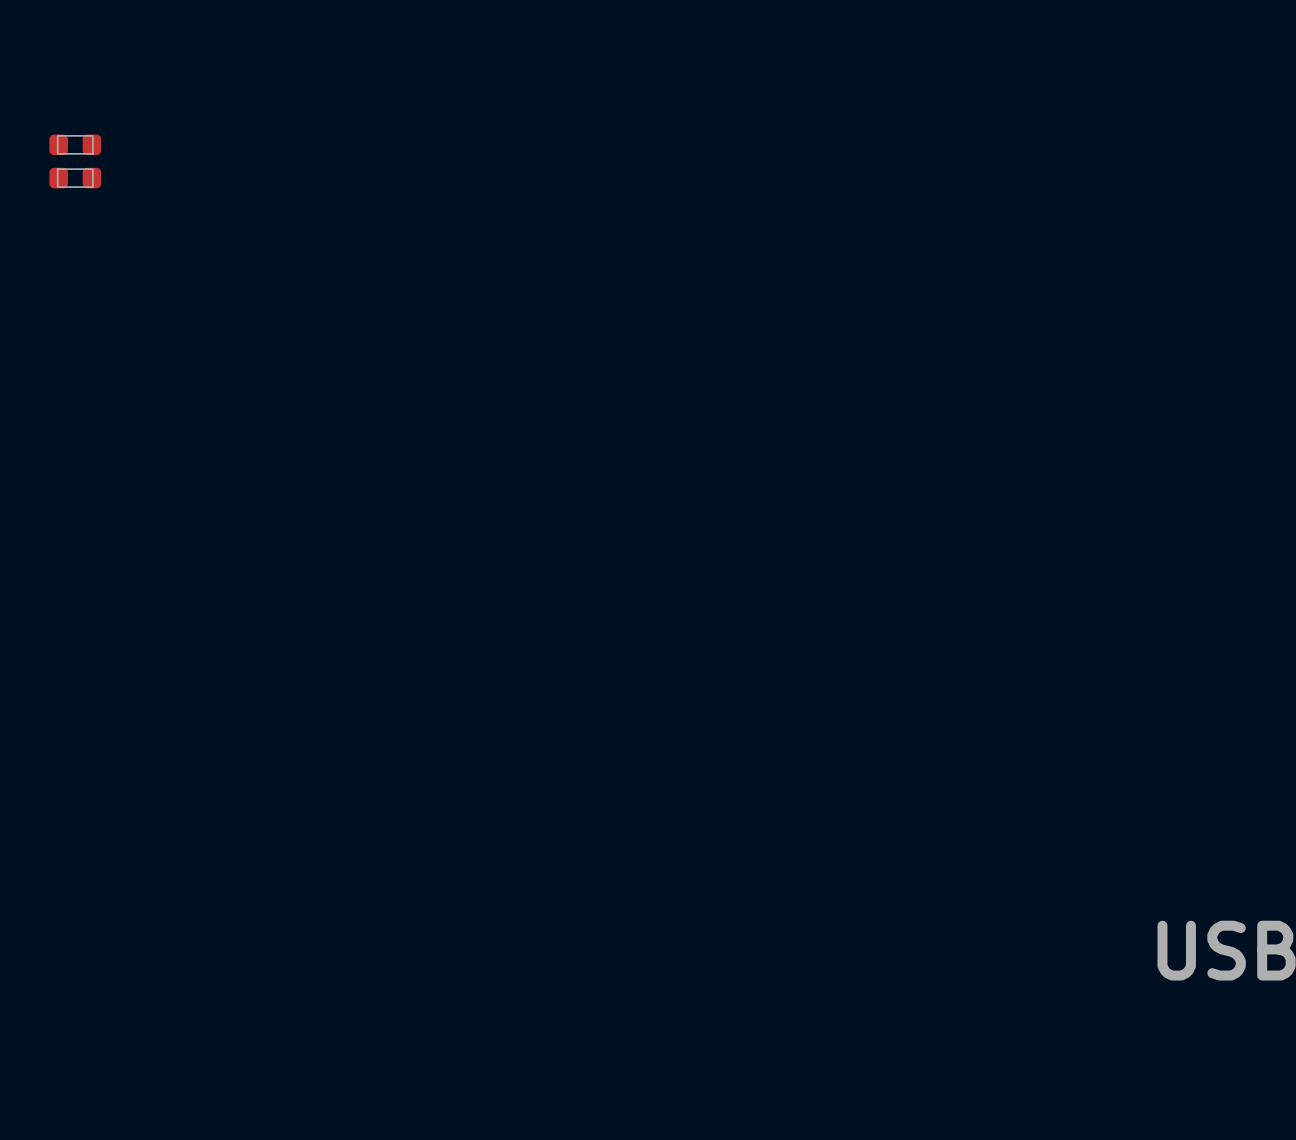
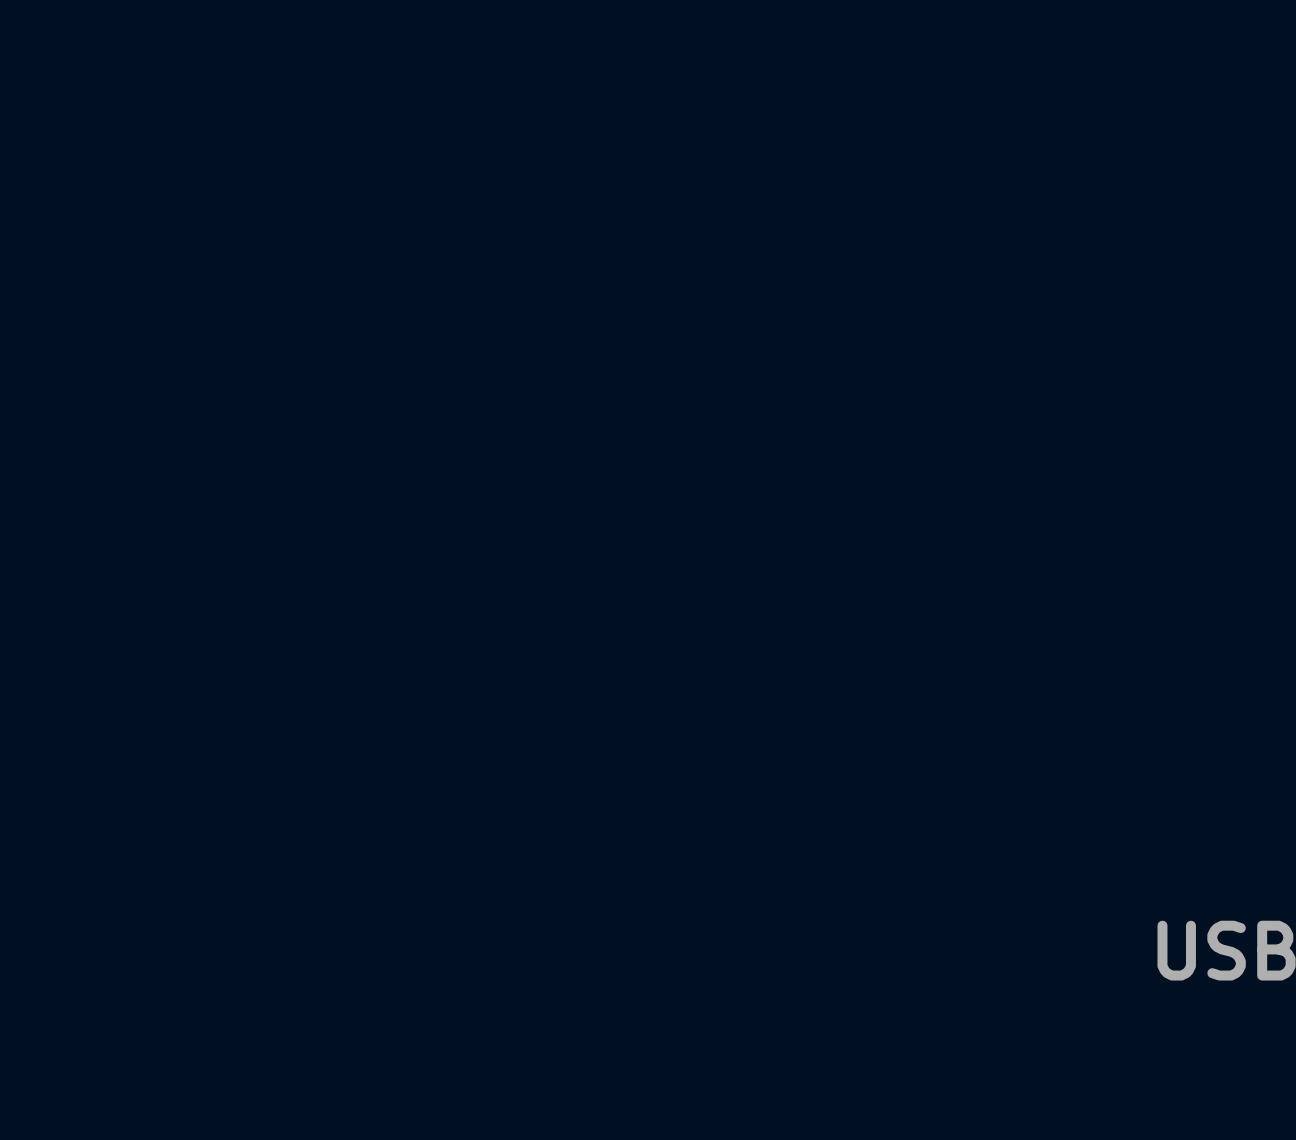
part: (75, 144) -> none
part: (75, 178) -> none

